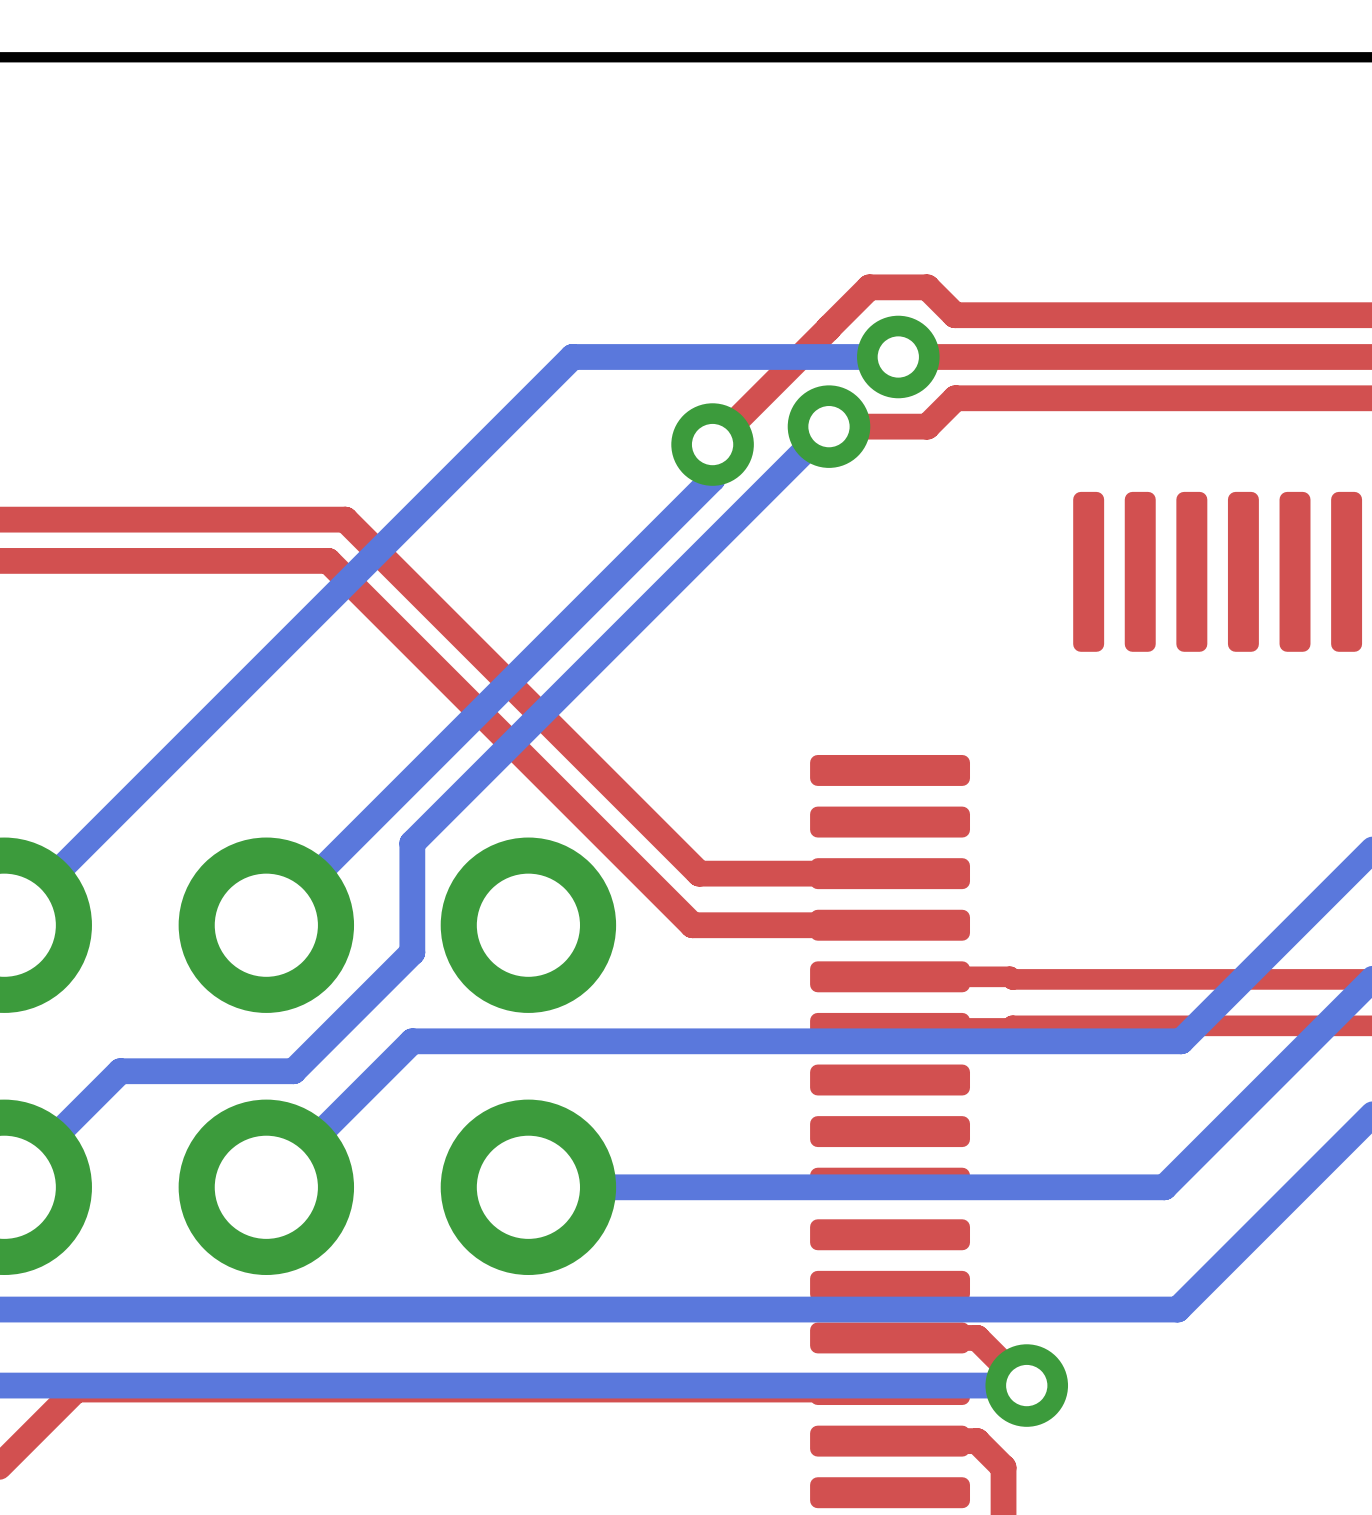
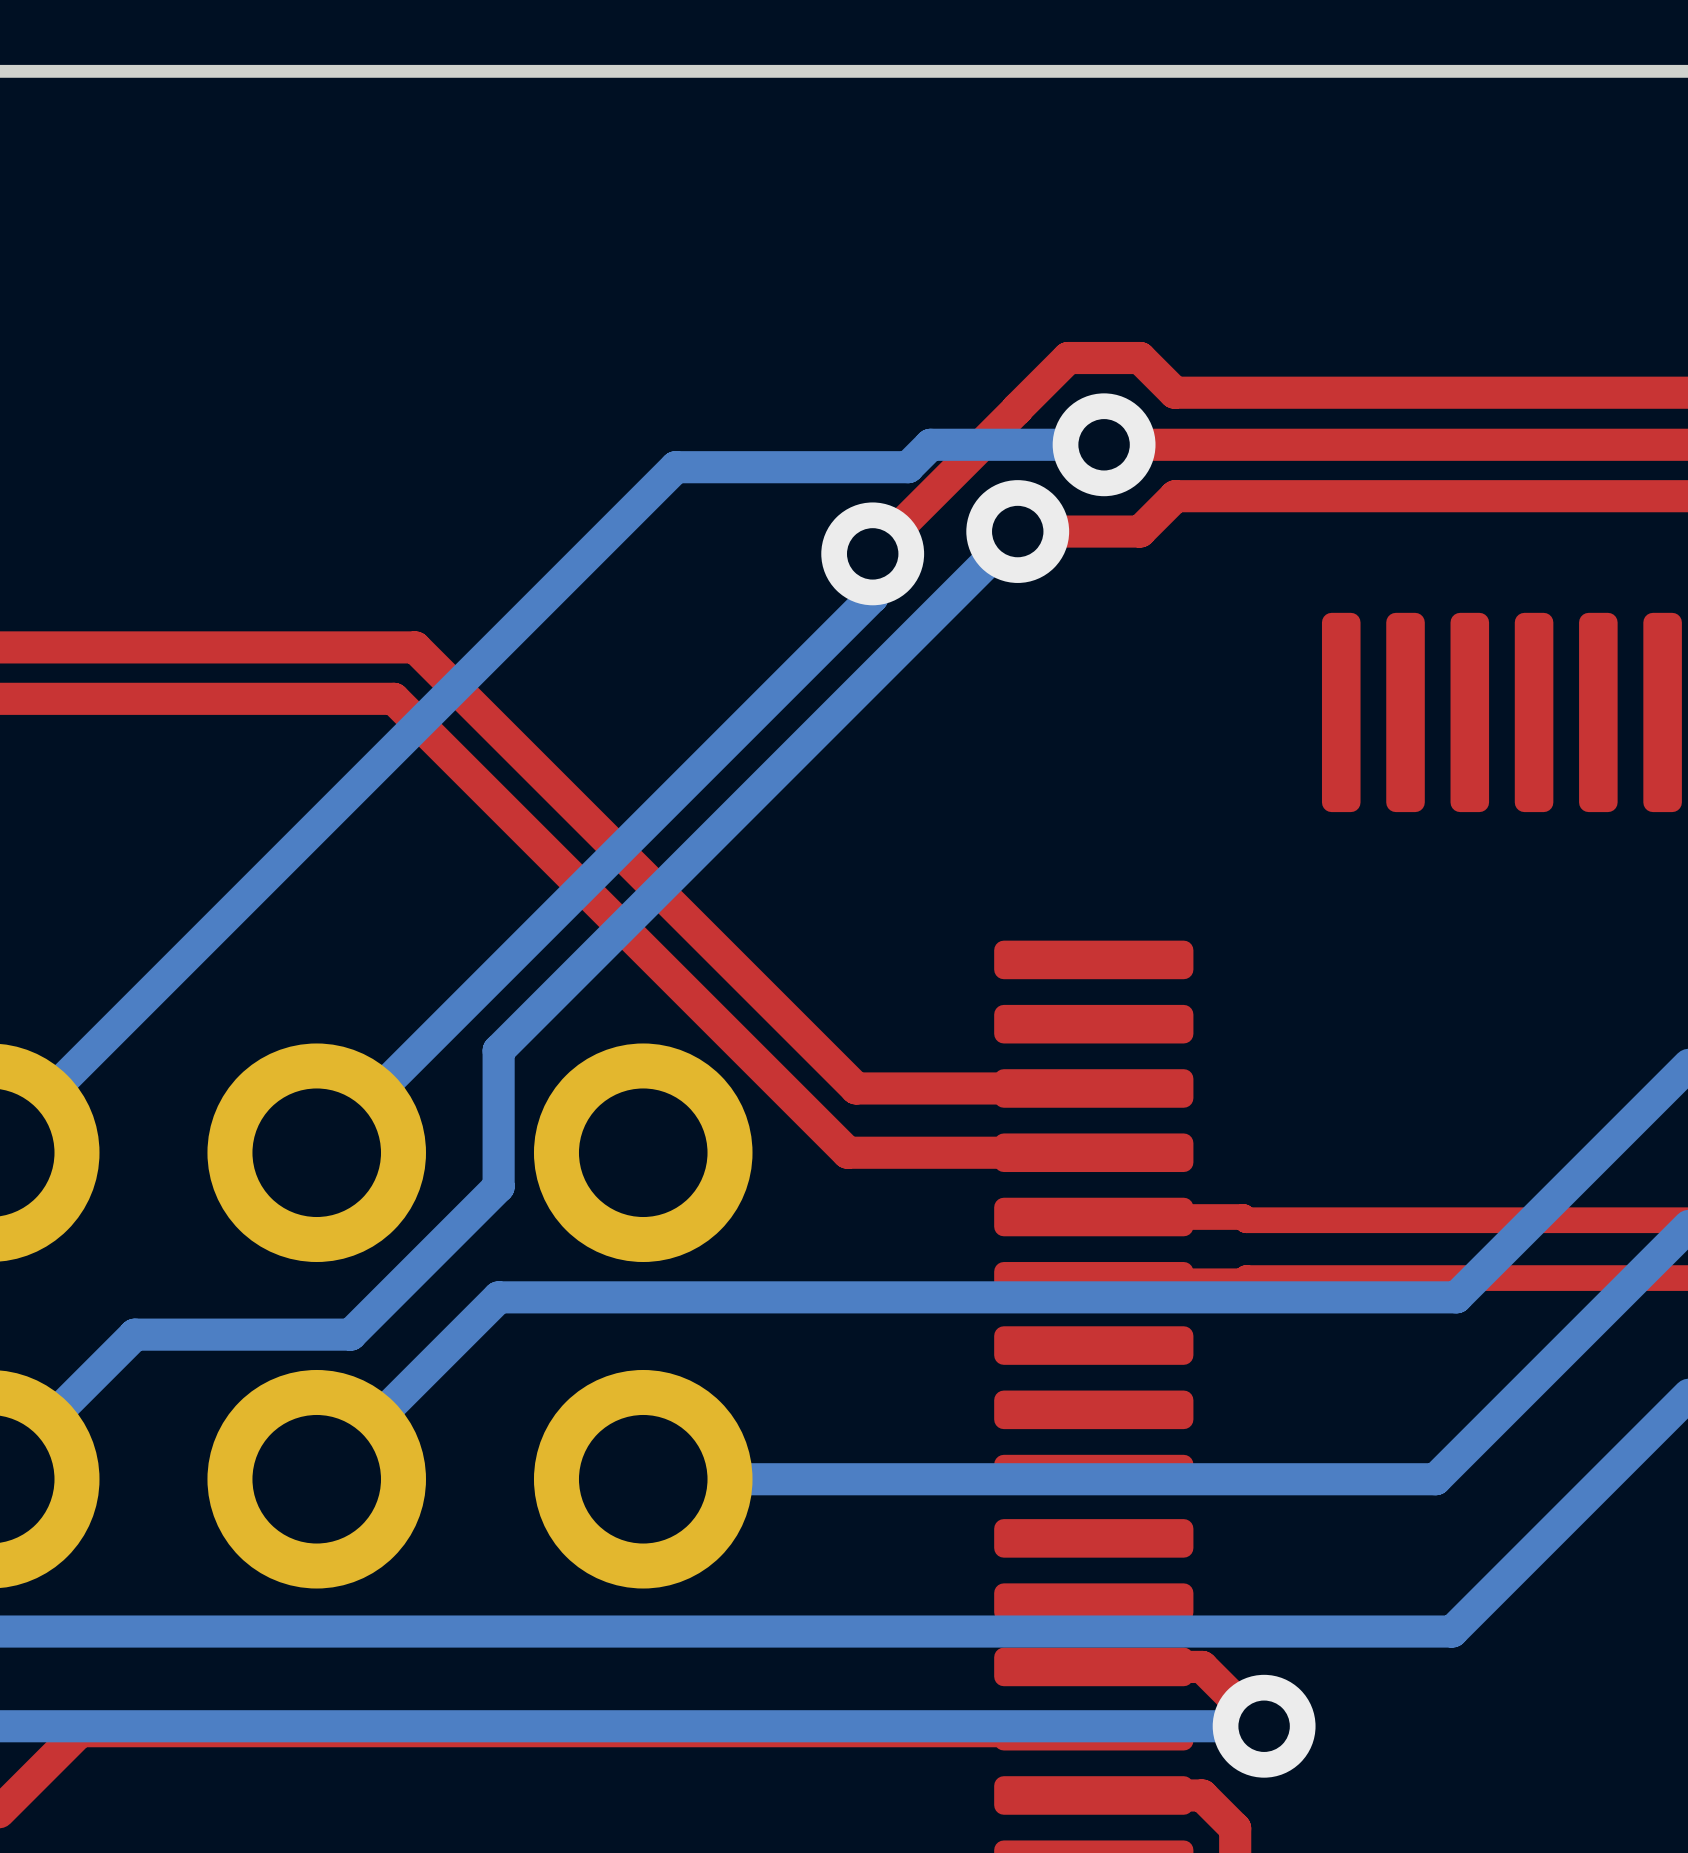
bottom track: (759, 357) (572, 357) (554, 374) -> (930, 444) (908, 467) (675, 467)

